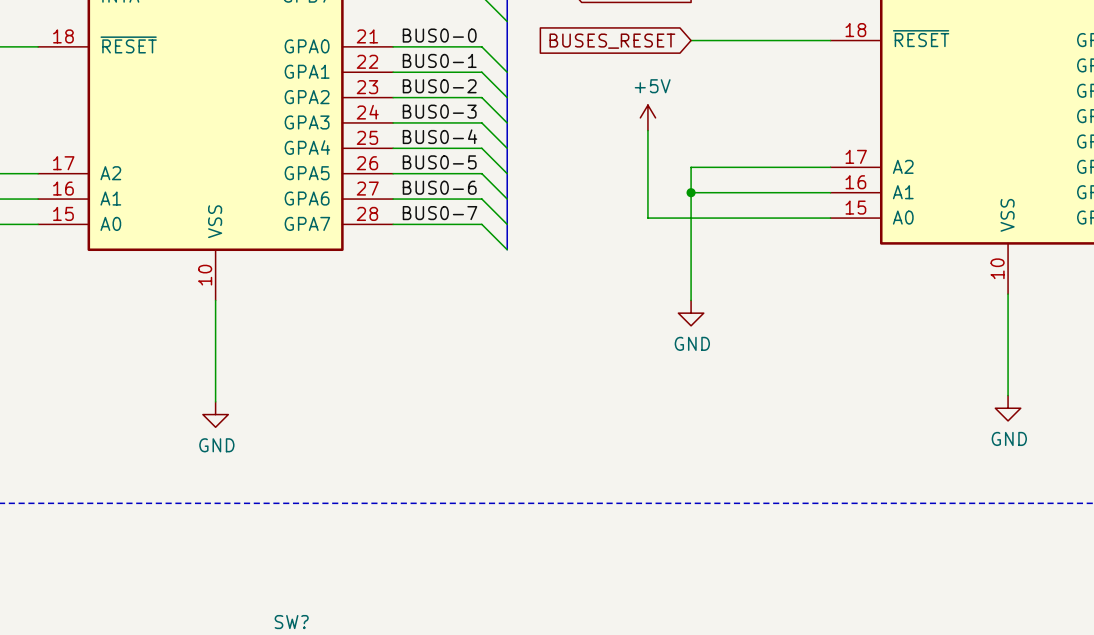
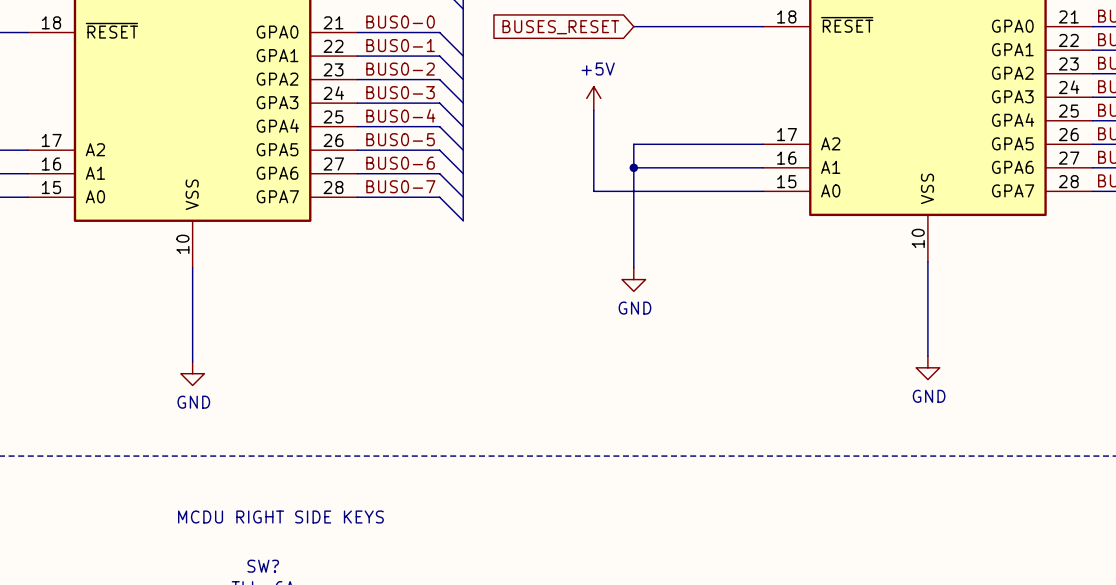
text: none -> MCDU RIGHT SIDE KEYS (280, 517)

